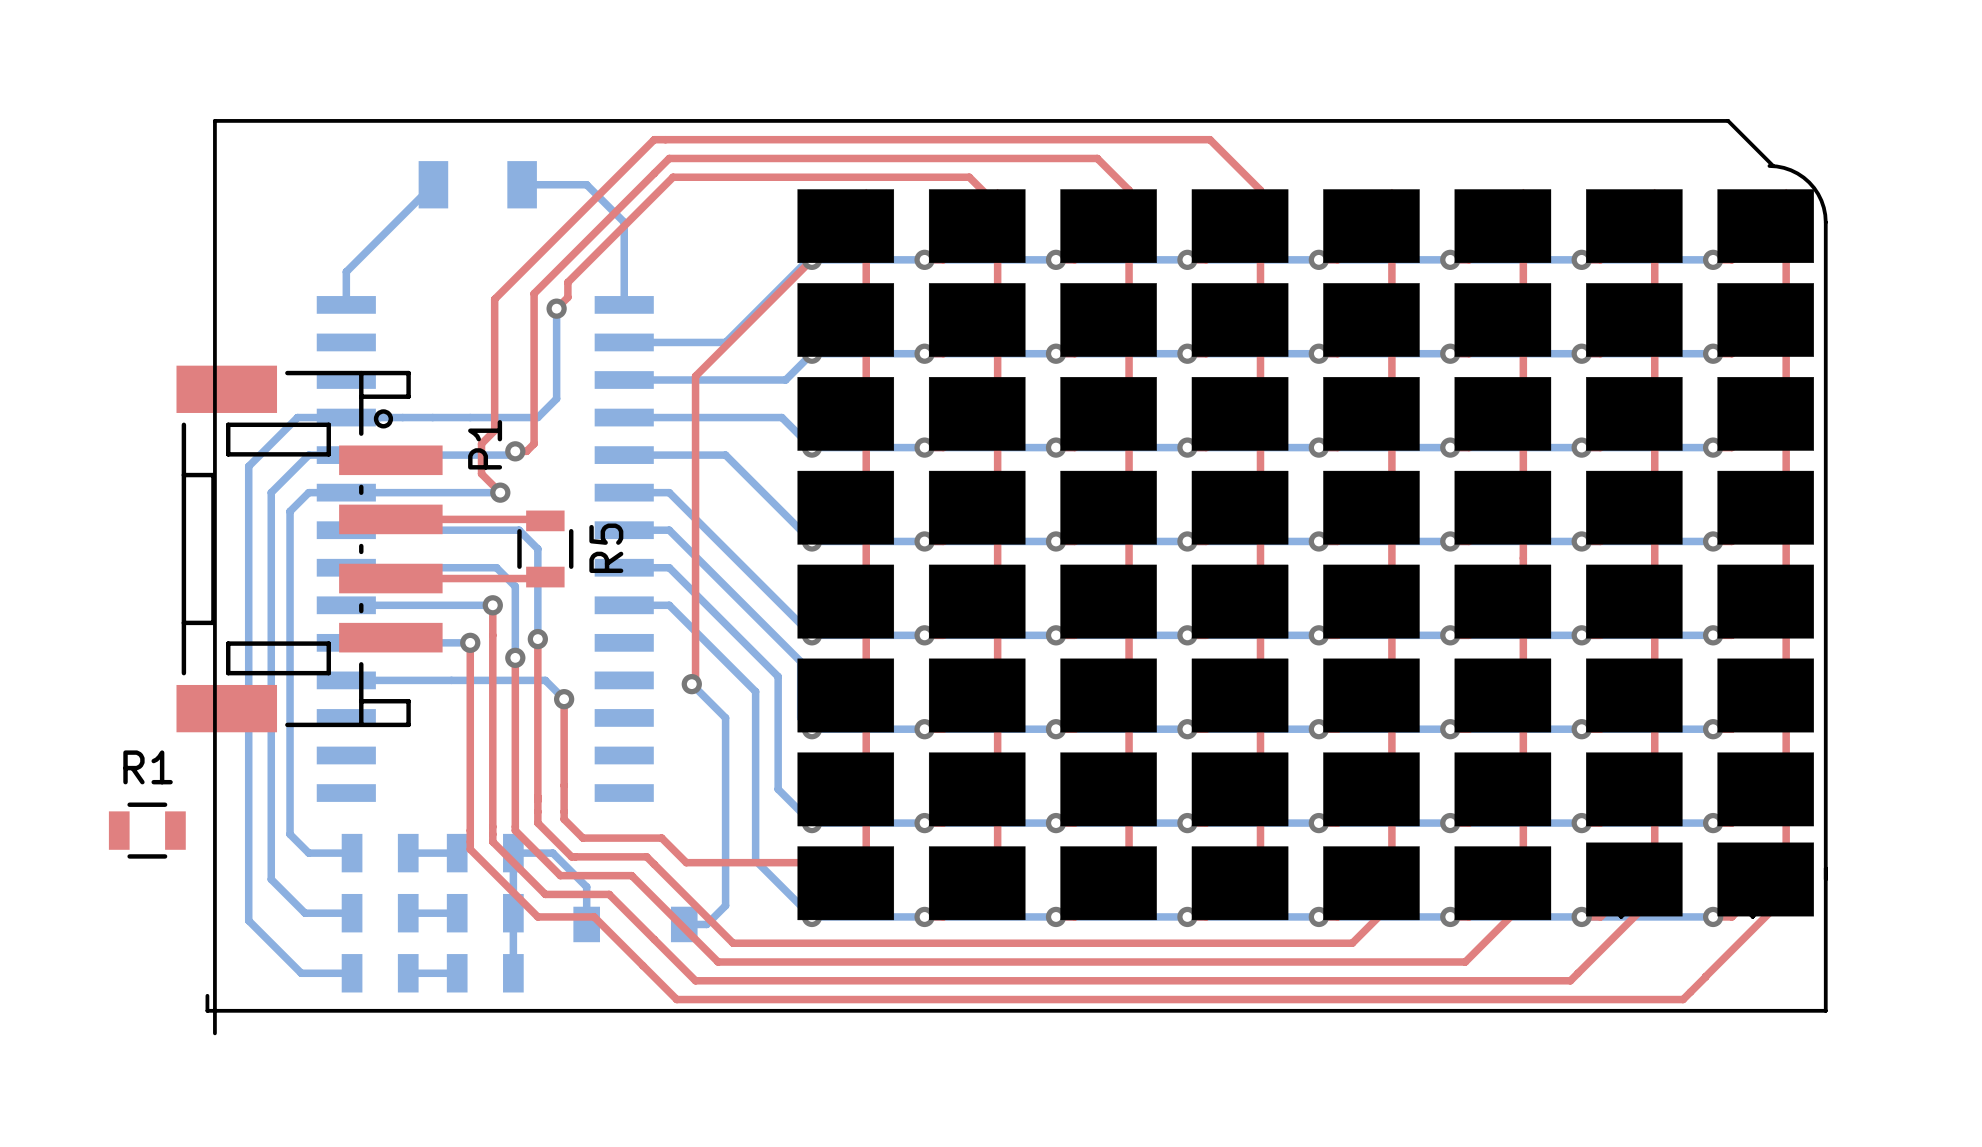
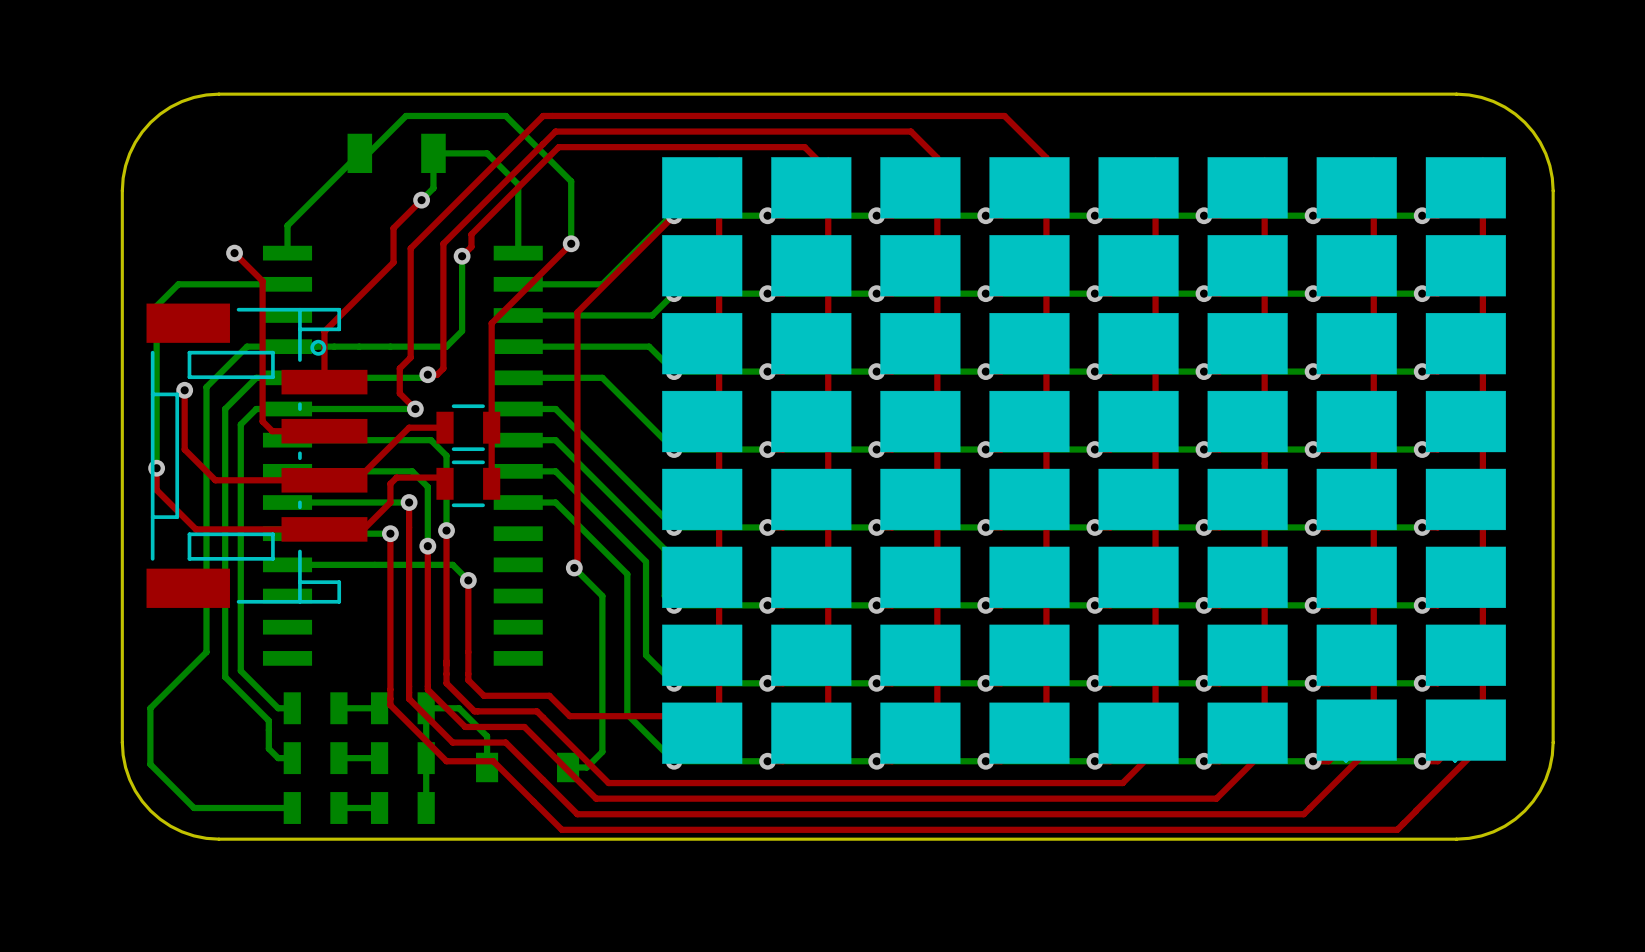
board edge: (1769, 165) (1790, 170) (1803, 177) (1818, 194) (1825, 214) (1825, 1010) (1754, 1010) -> none
board edge: (1773, 165) (1728, 120) (214, 120) (214, 1033) -> none
bottom track: none -> (359, 153) (368, 153) (406, 115) (505, 115) (571, 181) (571, 243)
bottom track: none -> (433, 153) (433, 188) (421, 200)
top track: none -> (421, 200) (393, 228) (393, 262) (324, 331) (324, 382)
via: none -> (421, 200)
top track: none -> (571, 243) (491, 323) (491, 483)
via: none -> (571, 243)
via: none -> (234, 253)
bottom track: none -> (287, 284) (178, 284) (156, 306) (156, 468)
P1 name: P1 (485, 444) -> none
top track: none -> (184, 390) (184, 449) (215, 480) (324, 480)
via: none -> (184, 390)
part: none -> (468, 427)
top track: (390, 519) (545, 520) -> (324, 431) (272, 431) (262, 421) (262, 281) (234, 253)
R5: (545, 548) -> none
top track: none -> (156, 468) (156, 490) (195, 529) (363, 529) (390, 502) (390, 483) (396, 477) (438, 477) (445, 483)
via: none -> (156, 468)
top track: (545, 577) (429, 578) -> (445, 427) (409, 427) (356, 480)
part: none -> (468, 483)
bottom track: (248, 785) (248, 920) (301, 973) -> (206, 652) (150, 708) (150, 764) (194, 808) (250, 808)
bottom track: (290, 808) (290, 834) -> (225, 677) (240, 692)
bottom track: (271, 815) (271, 879) (305, 913) (335, 913) -> (256, 708) (268, 720) (268, 748) (278, 758)
R1: (147, 830) -> none
bottom track: (308, 853) (335, 853) -> (240, 670) (278, 708)
board edge: (207, 995) (207, 1010) (263, 1010) -> (1456, 839) (1481, 835) (1493, 831) (1515, 819) (1524, 810) (1540, 790) (1545, 779) (1549, 767) (1553, 742) (1552, 178) (1545, 153) (1533, 131) (1524, 122) (1504, 107) (1493, 101) (1481, 97) (1456, 94) (218, 94) (193, 97) (170, 107) (150, 122) (135, 142) (125, 165) (123, 178) (123, 755) (129, 779) (135, 790) (142, 801) (160, 819) (170, 826) (193, 835) (218, 839)

